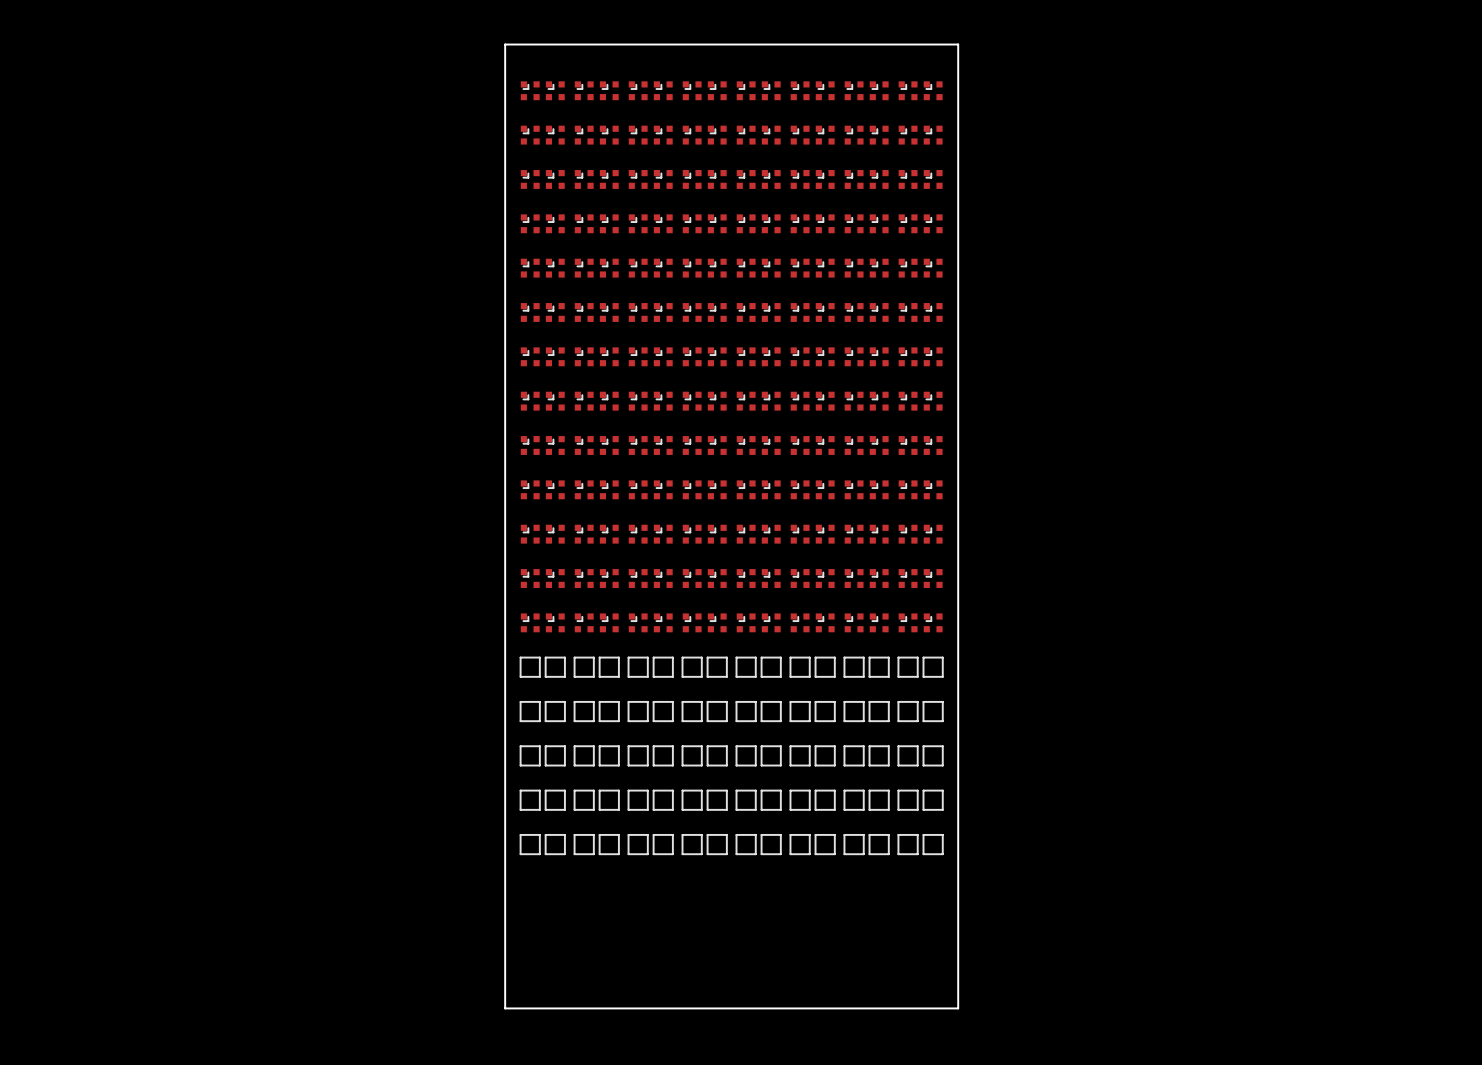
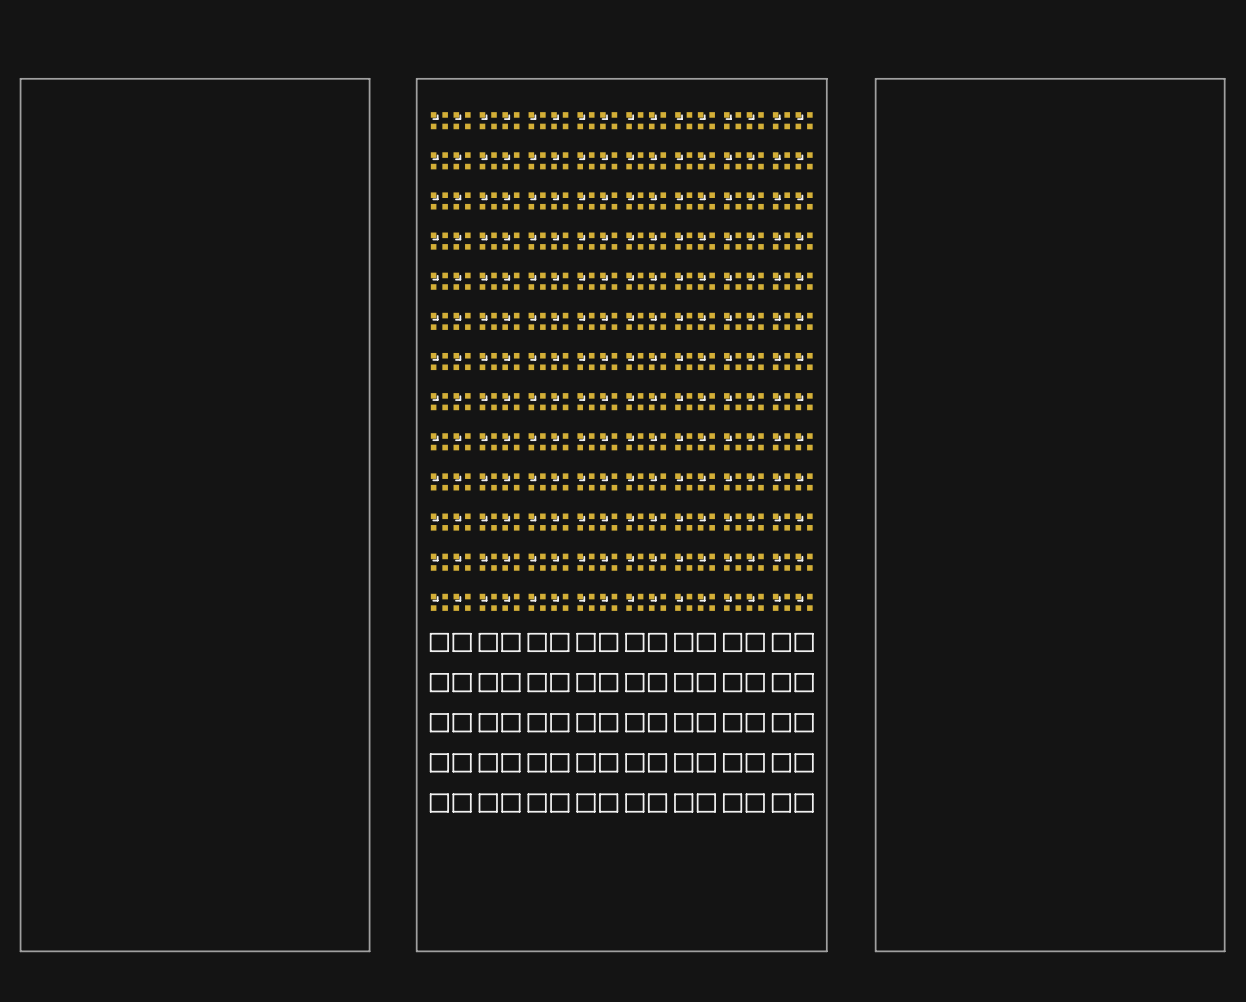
board edge: none -> (20, 78) (369, 78) (369, 951) (20, 951) (20, 78)
board edge: none -> (875, 78) (1224, 78) (1224, 951) (875, 951) (875, 78)

